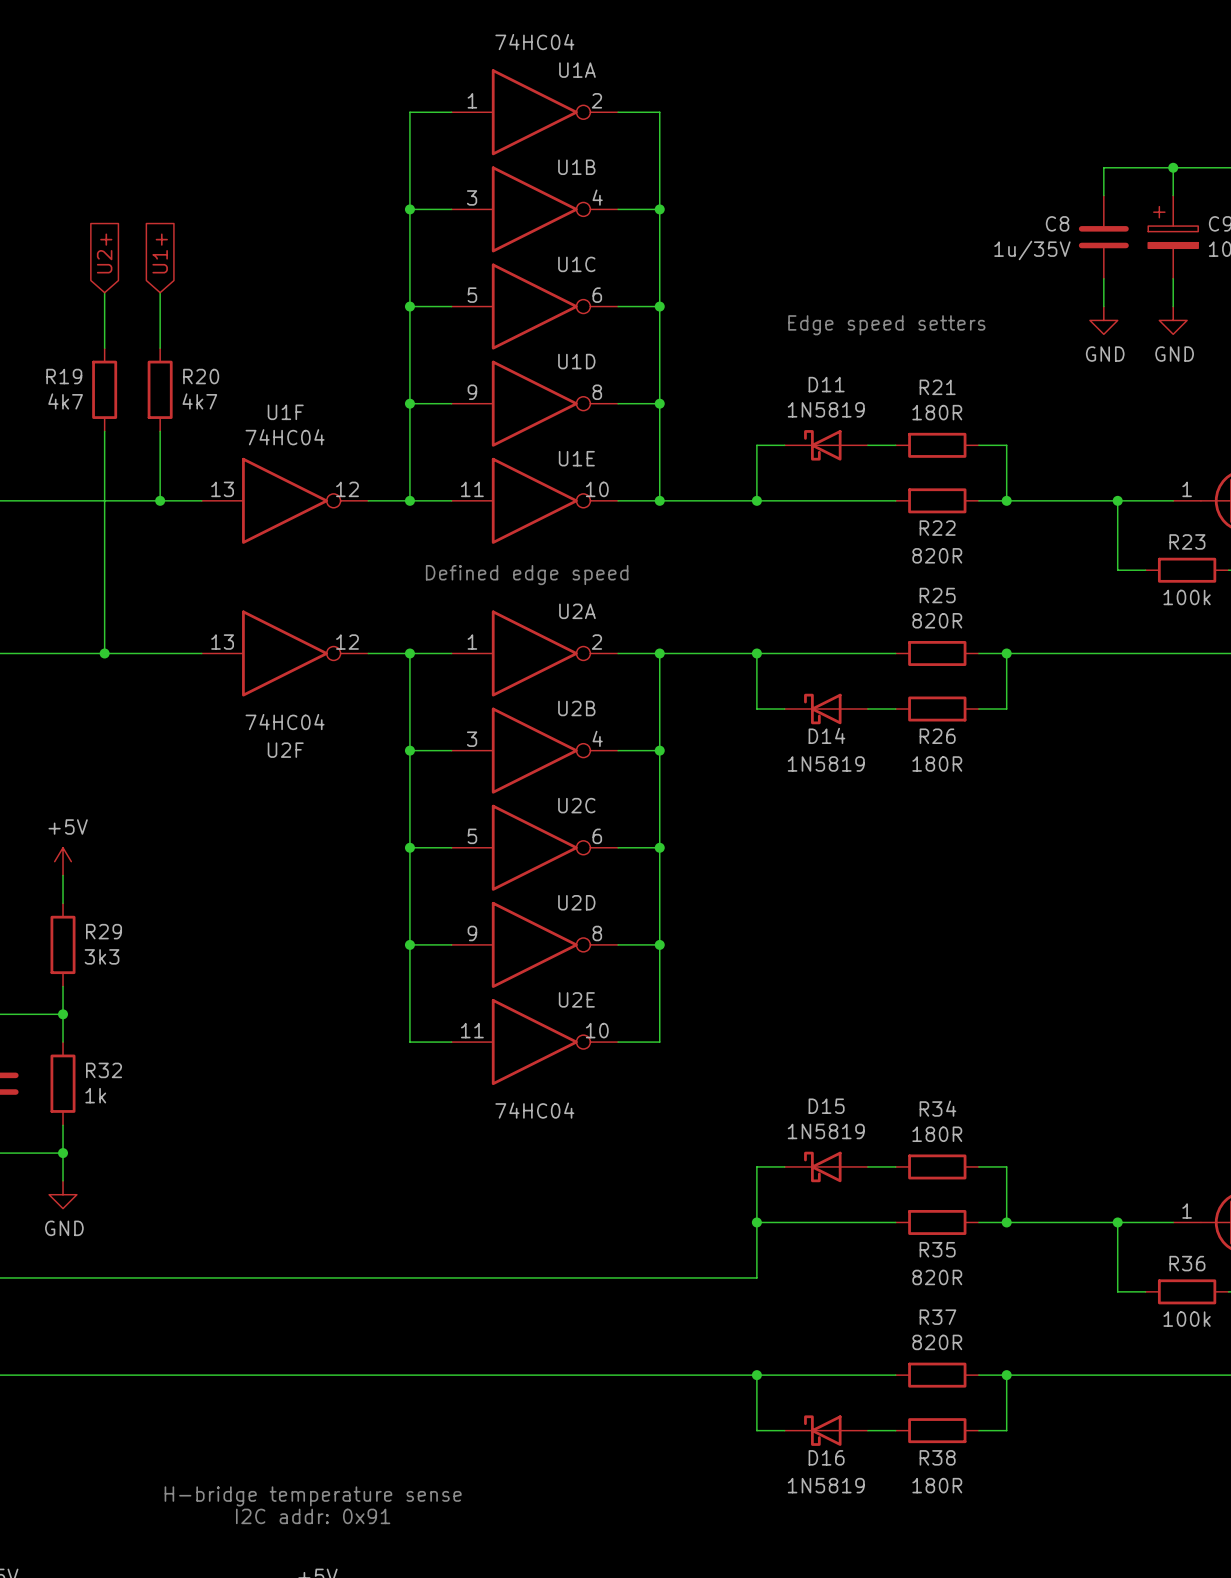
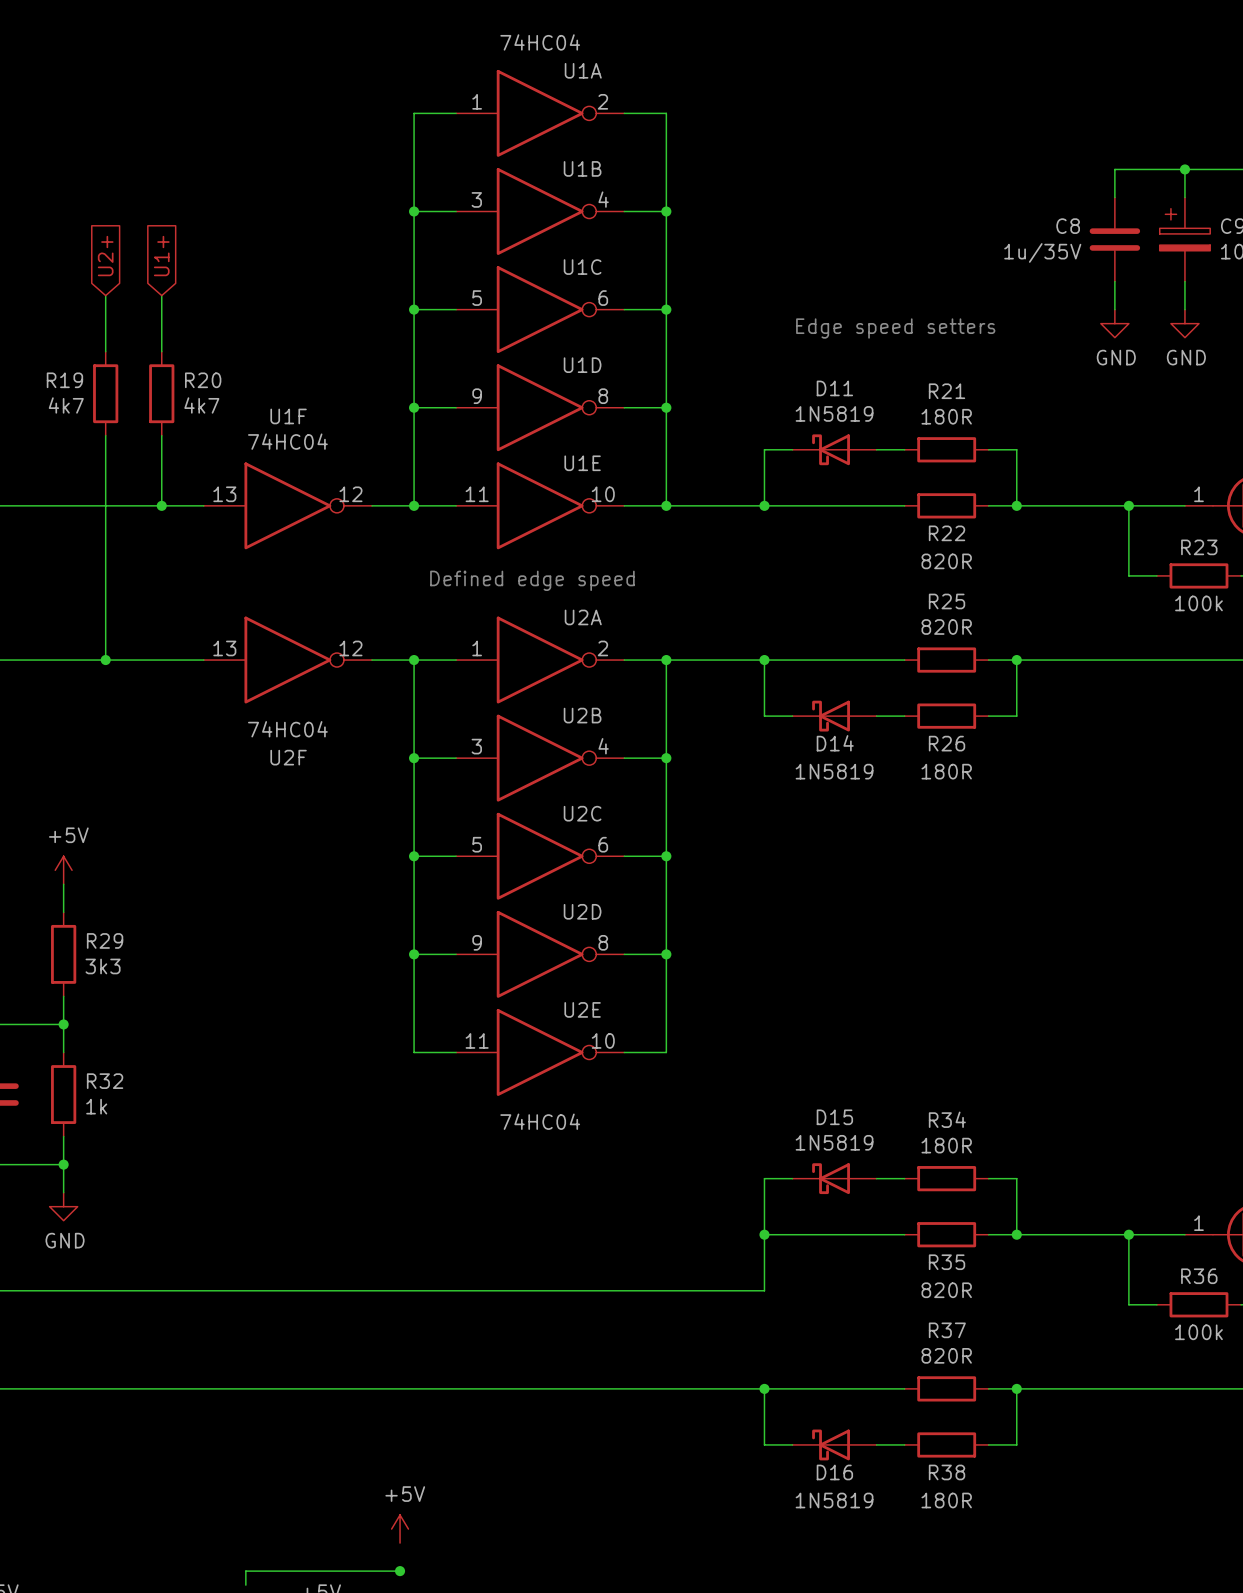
text: H-bridge temperature sense (313, 1496) -> none
power symbol: none -> +5V (400, 1529)
text: I2C addr: 0x91 (313, 1516) -> none
wire: none -> (400, 1571) (245, 1571) (245, 1585)
junction: none -> (400, 1571)

